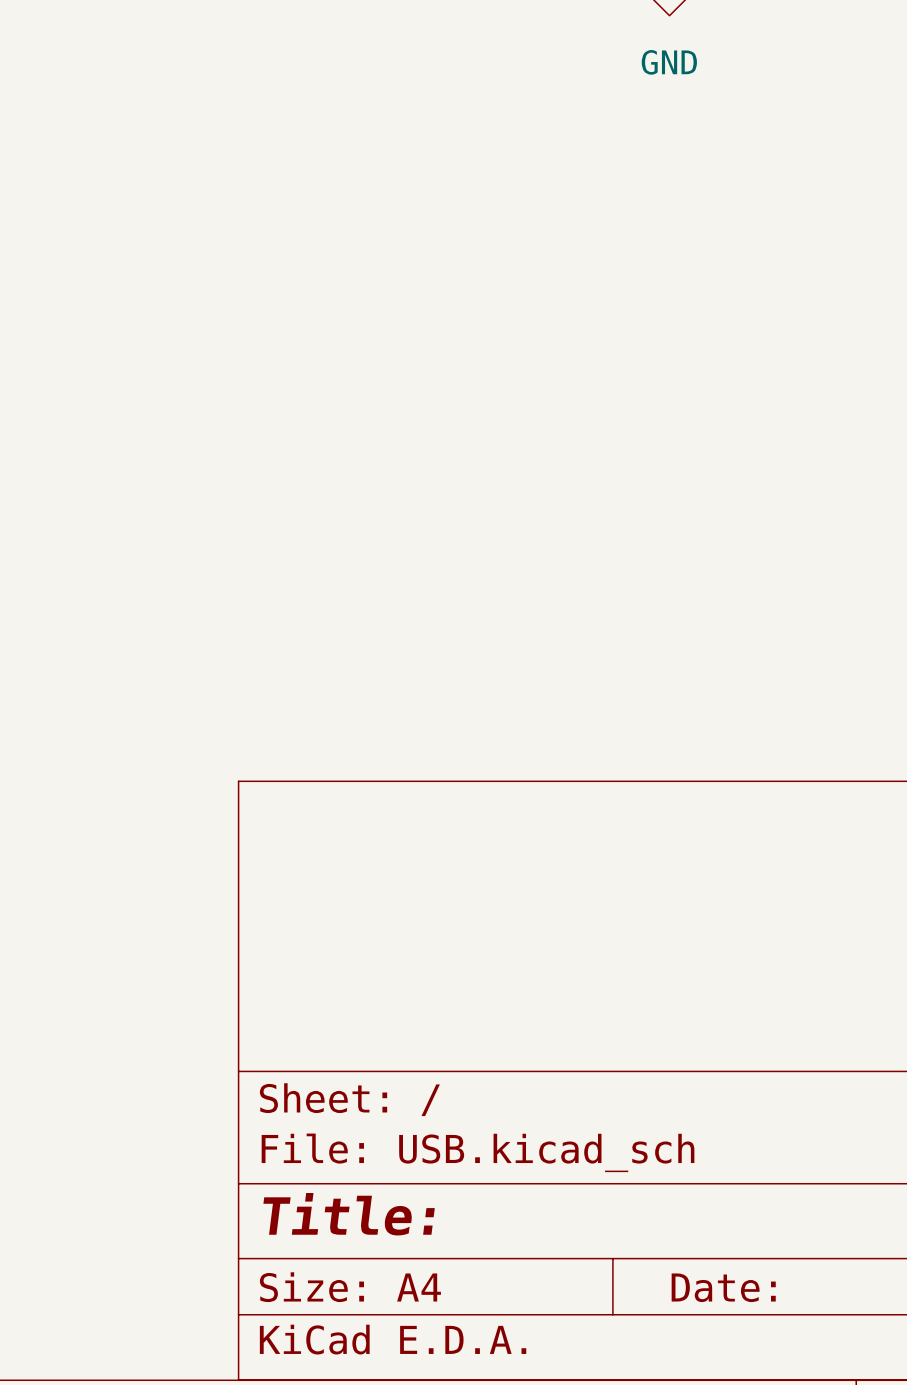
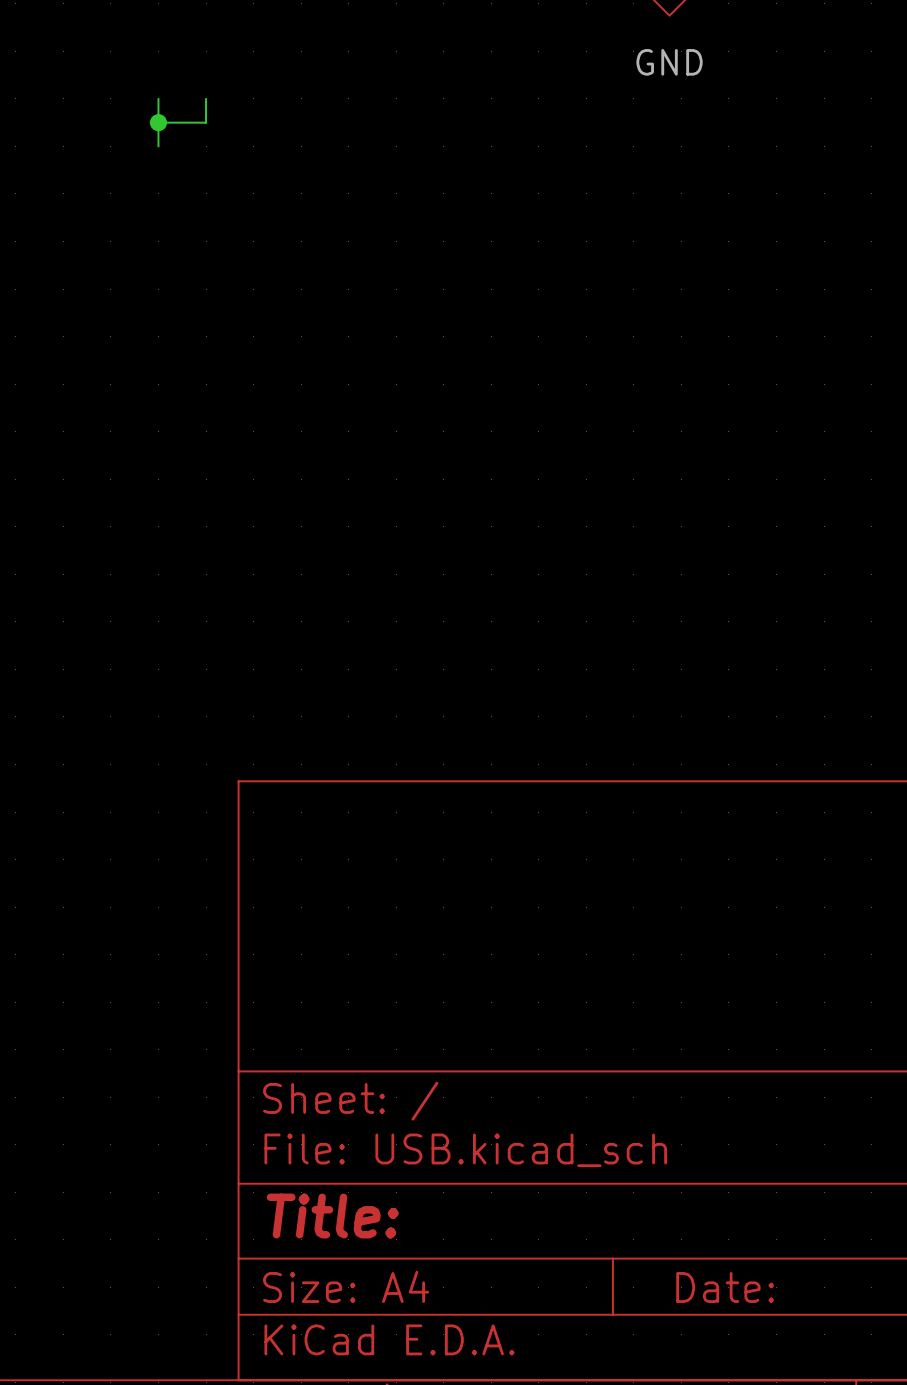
wire: none -> (158, 98) (158, 146)
wire: none -> (206, 98) (206, 122) (158, 122)
junction: none -> (158, 122)

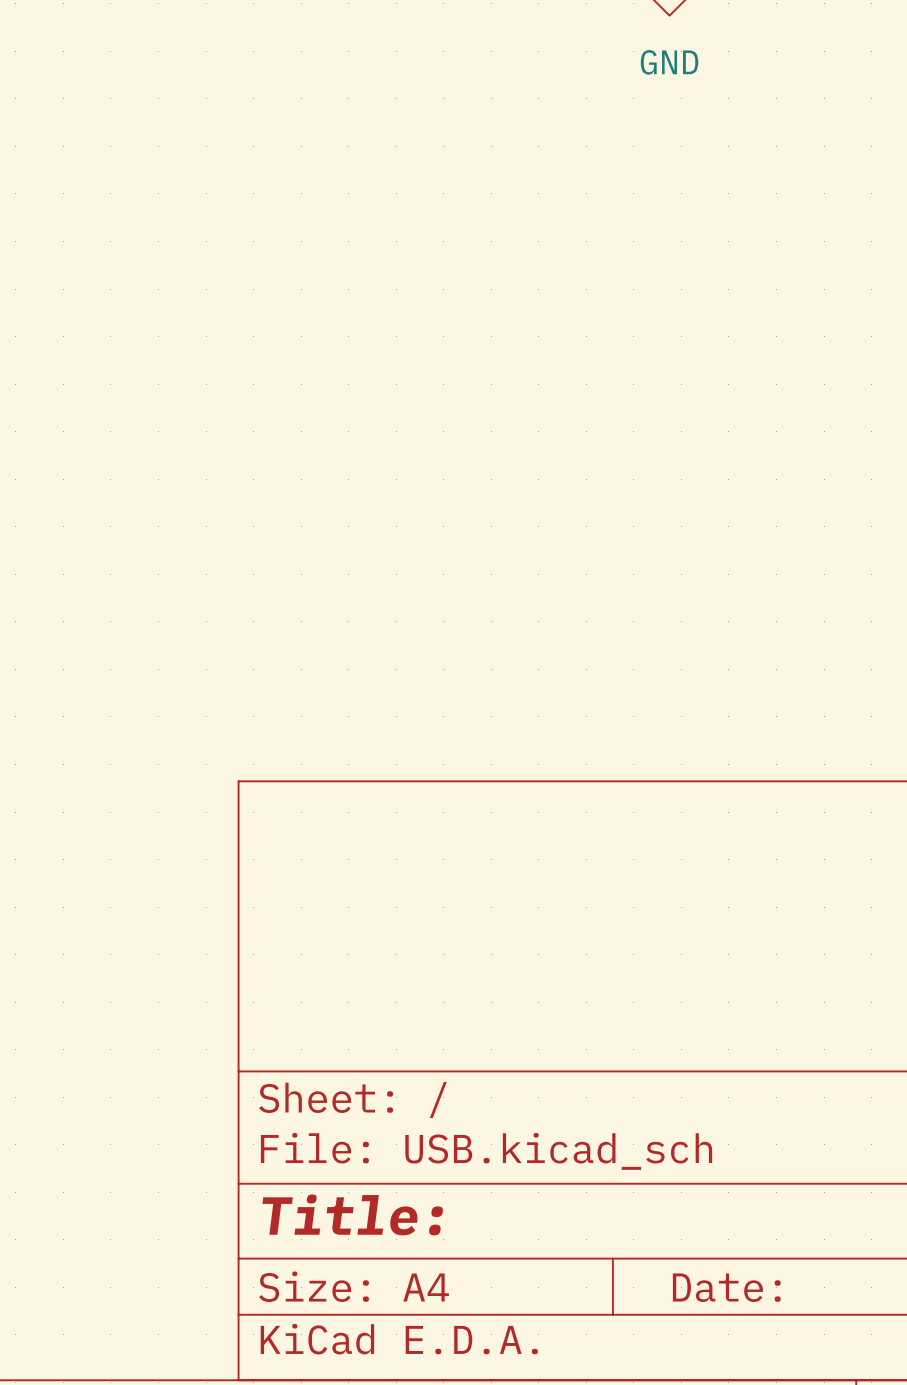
wire: (158, 98) (158, 146) -> none
wire: (206, 98) (206, 122) (158, 122) -> none
junction: (158, 122) -> none

